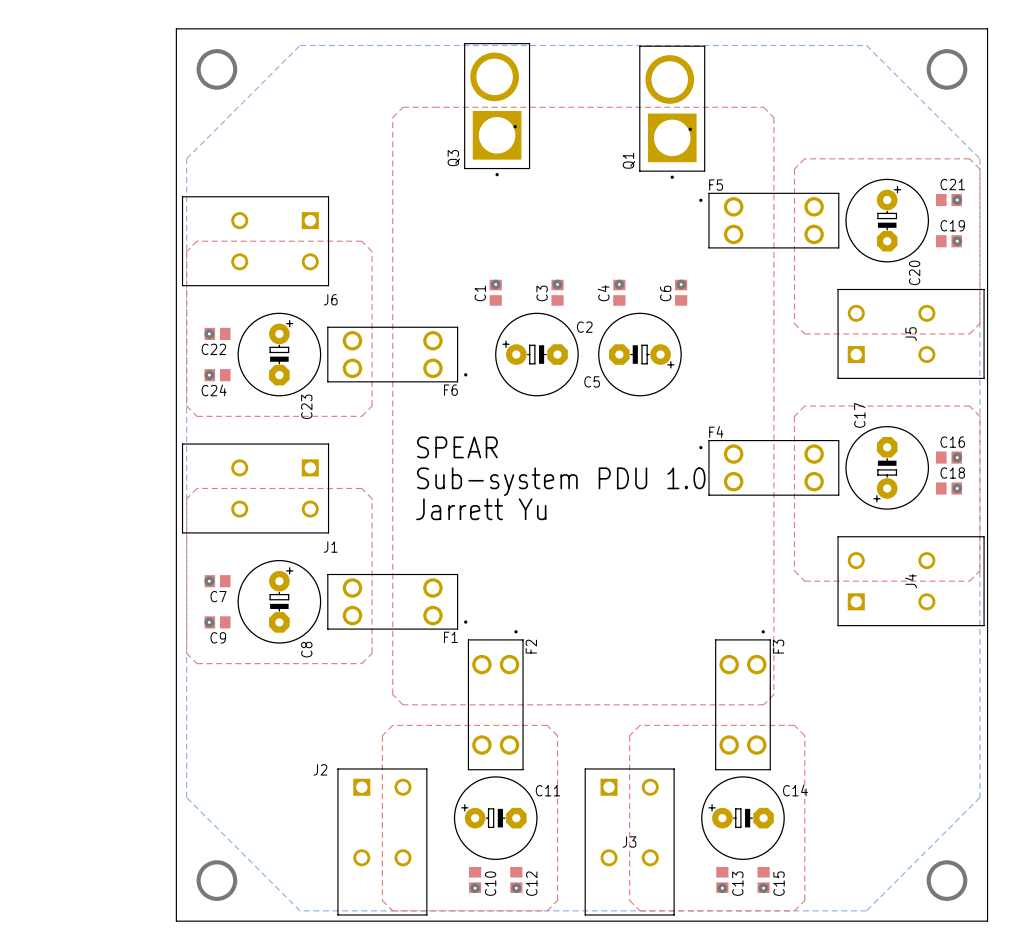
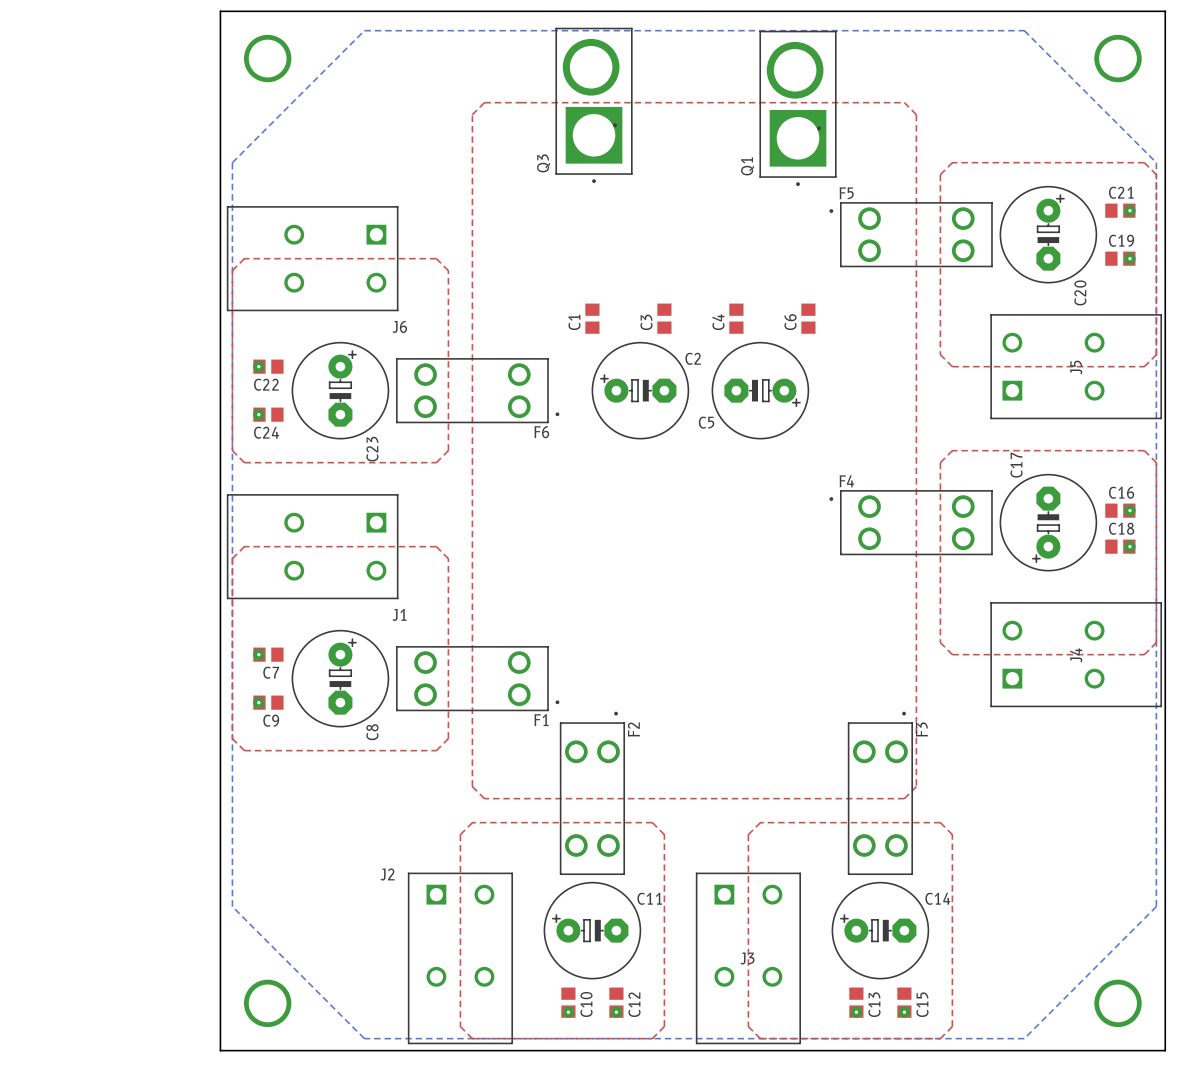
via: (495, 284) -> none
via: (557, 284) -> none
via: (619, 284) -> none
via: (681, 284) -> none
text: SPEAR (457, 447) -> none
text: Sub-system PDU 1.0 (561, 481) -> none
text: Jarrett Yu (481, 509) -> none

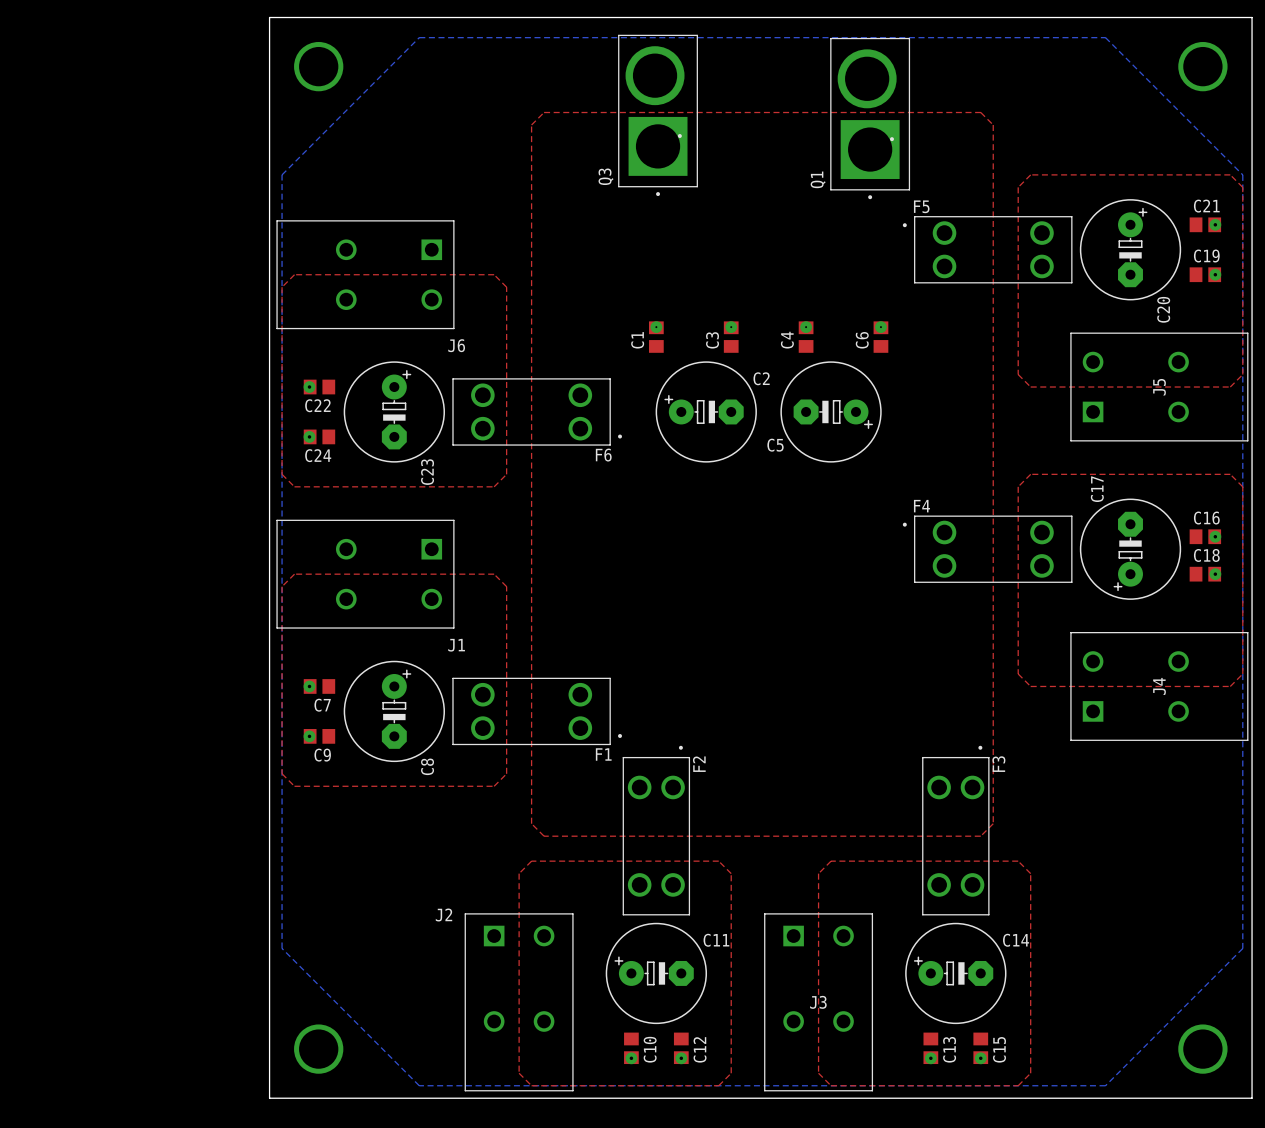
via: none -> (656, 327)
via: none -> (731, 327)
via: none -> (806, 327)
via: none -> (880, 327)

